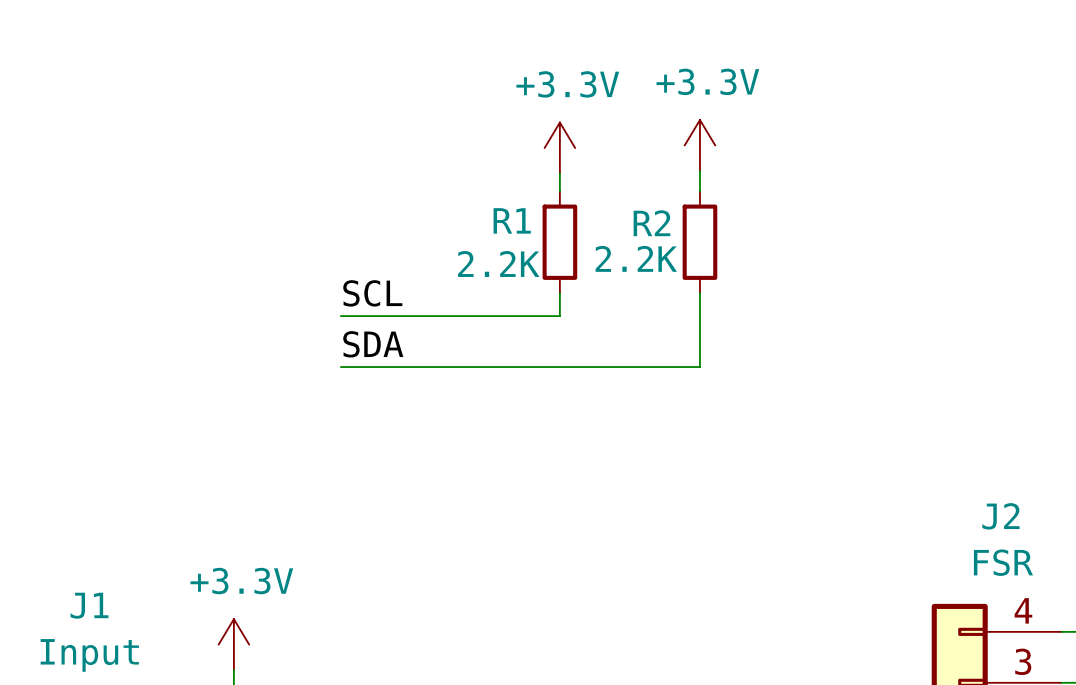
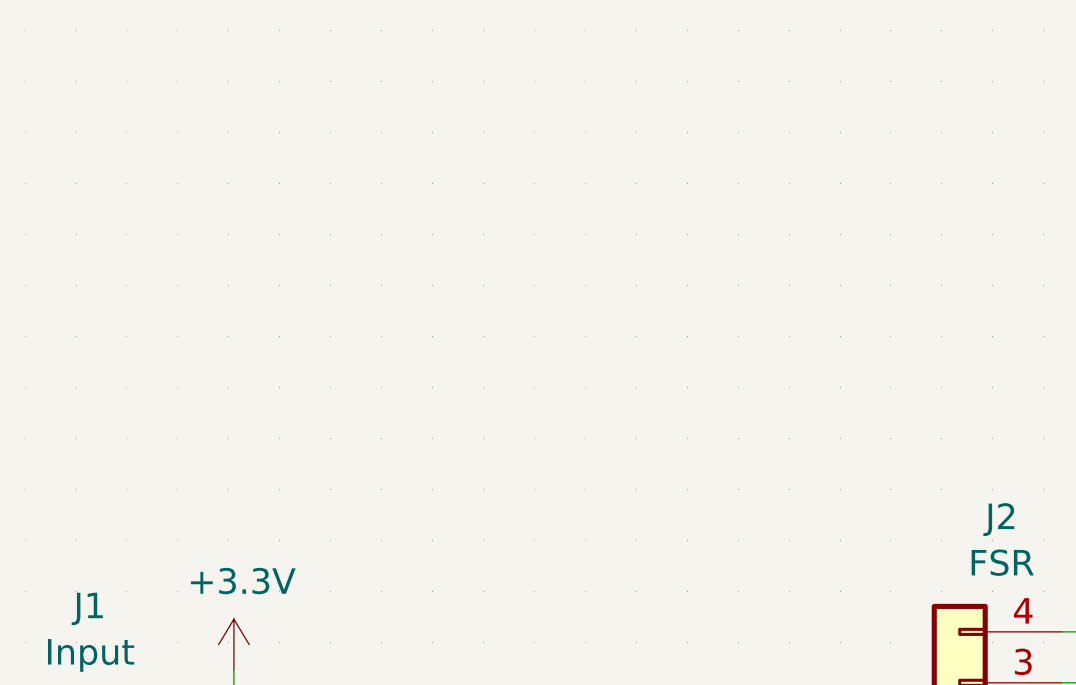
power symbol: +3.3V (699, 145) -> none
power symbol: +3.3V (559, 148) -> none
wire: (699, 170) (699, 191) -> none
wire: (559, 173) (559, 191) -> none
R1: 2.2K (559, 242) -> none
R2: 2.2K (699, 242) -> none
label: SCL (372, 293) -> none
wire: (559, 293) (559, 316) (340, 316) -> none
wire: (699, 293) (699, 367) (340, 367) -> none
label: SDA (373, 344) -> none

